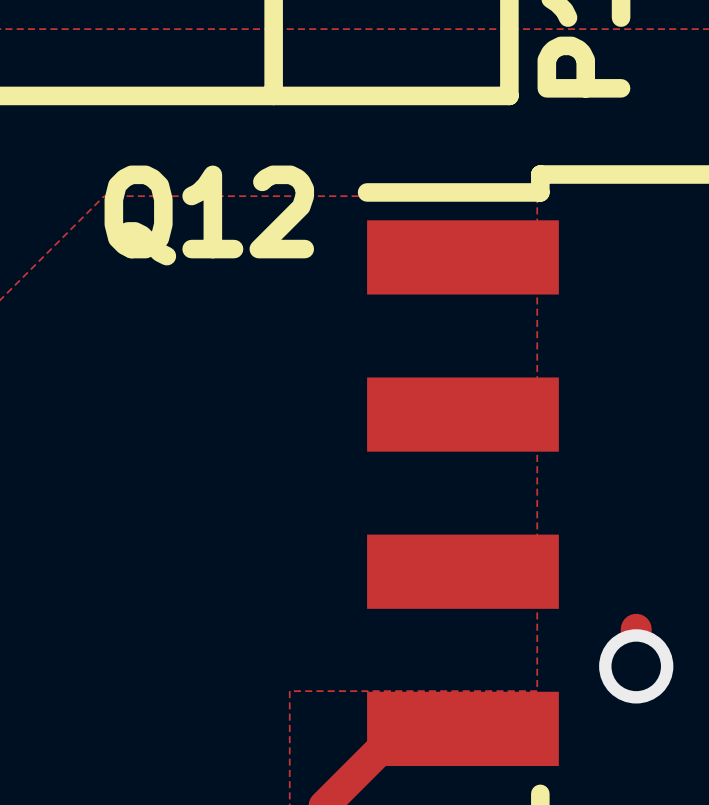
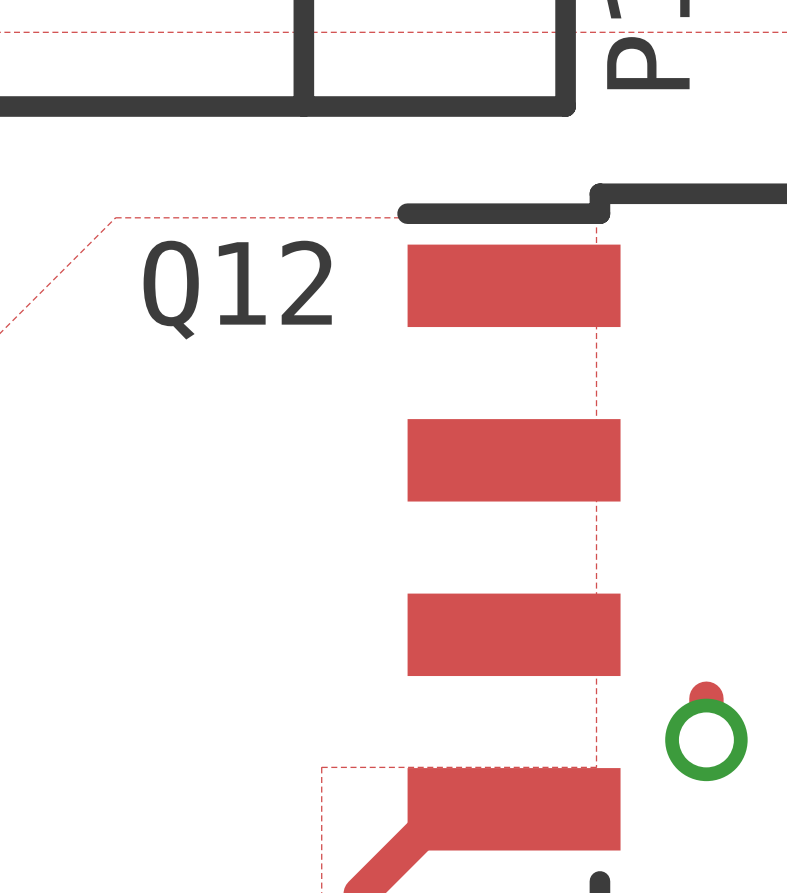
Q12 name position: Q12 (209, 215) -> Q12 (237, 290)

